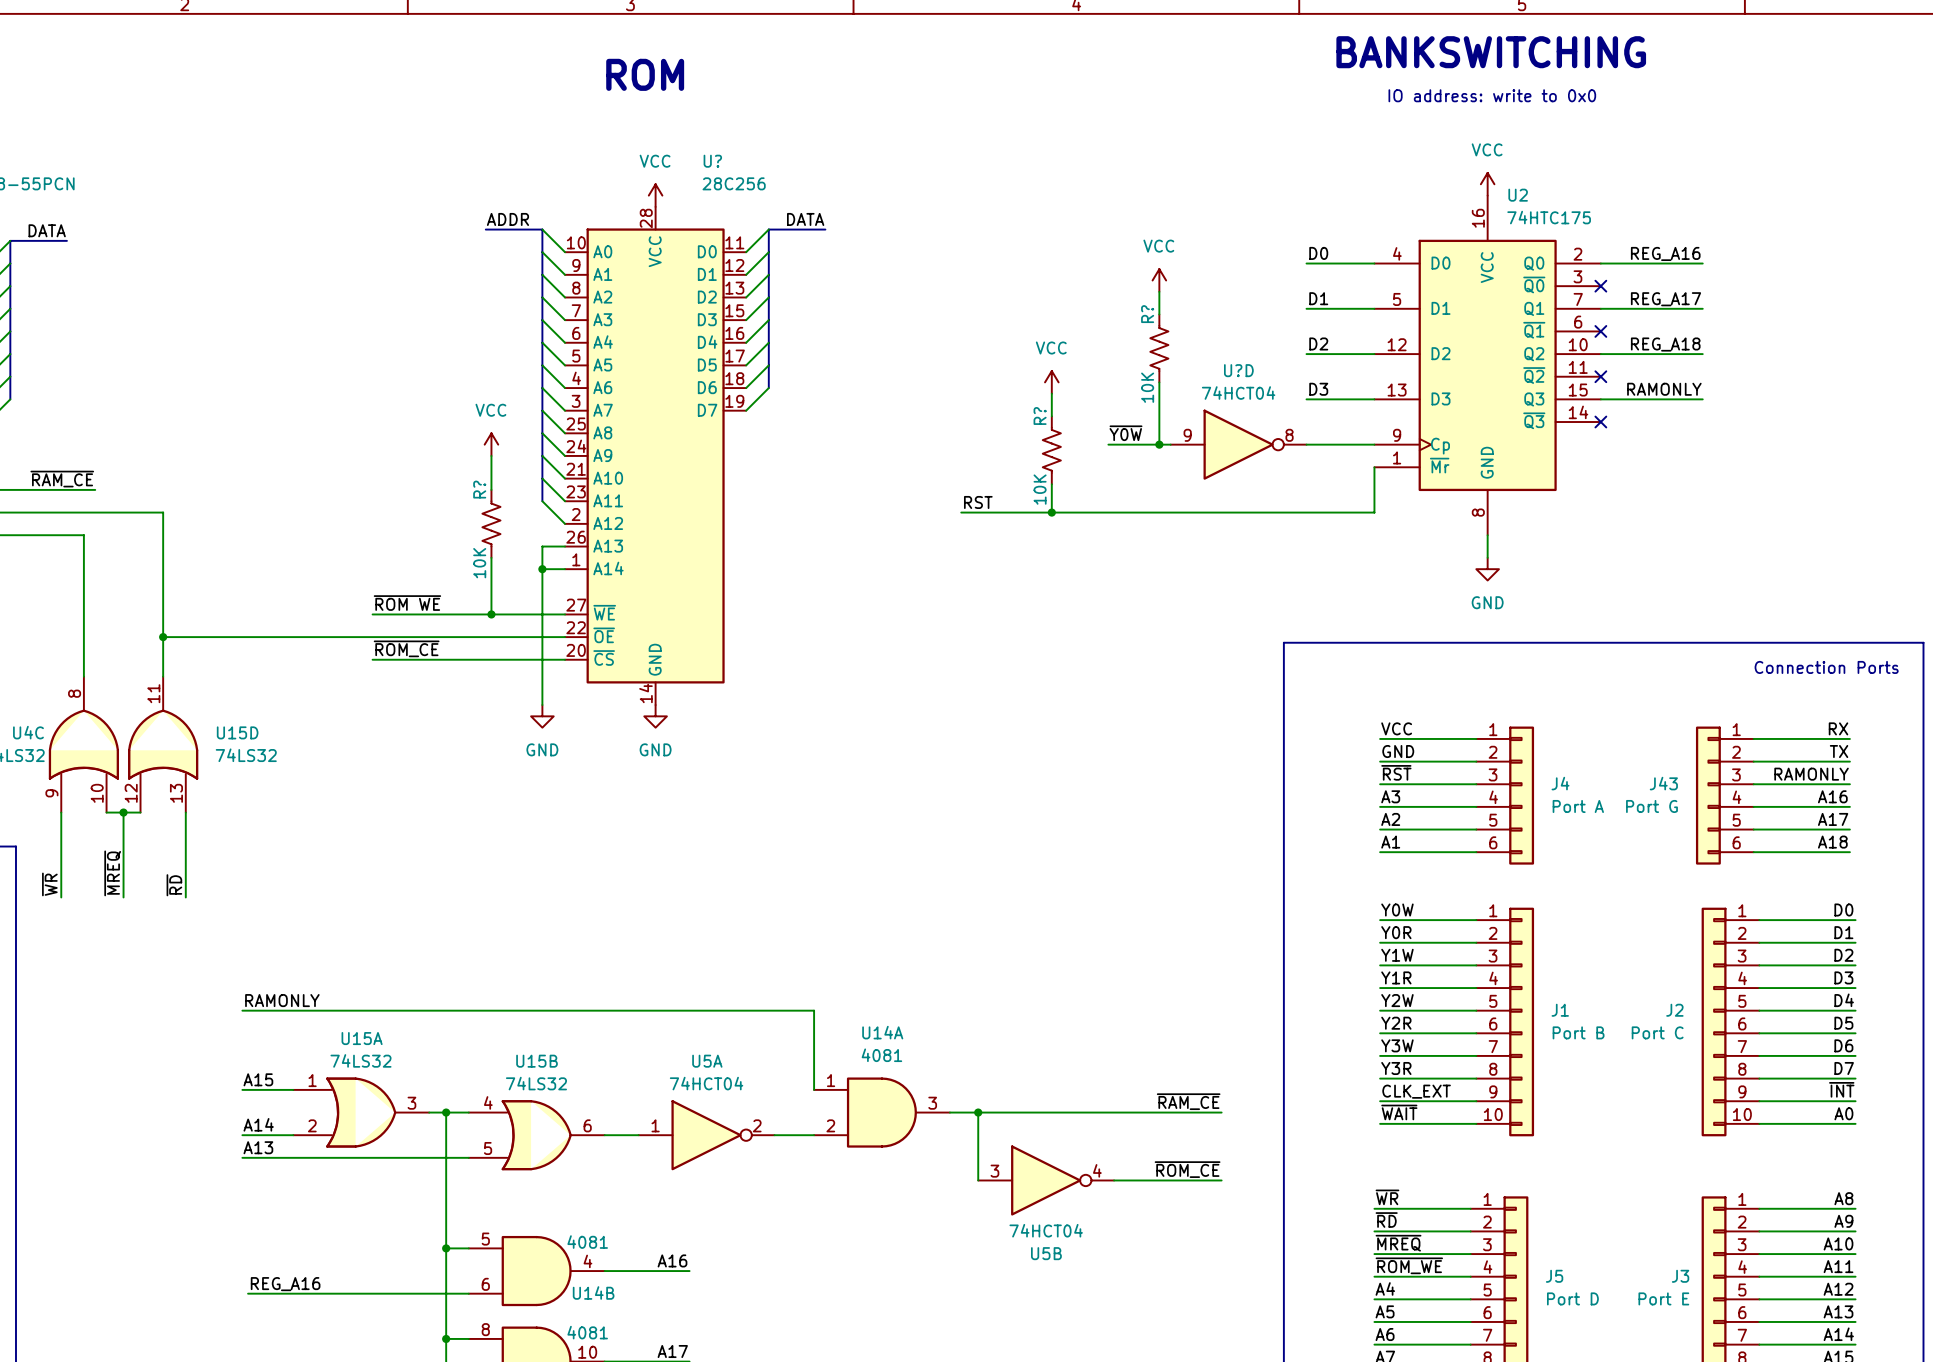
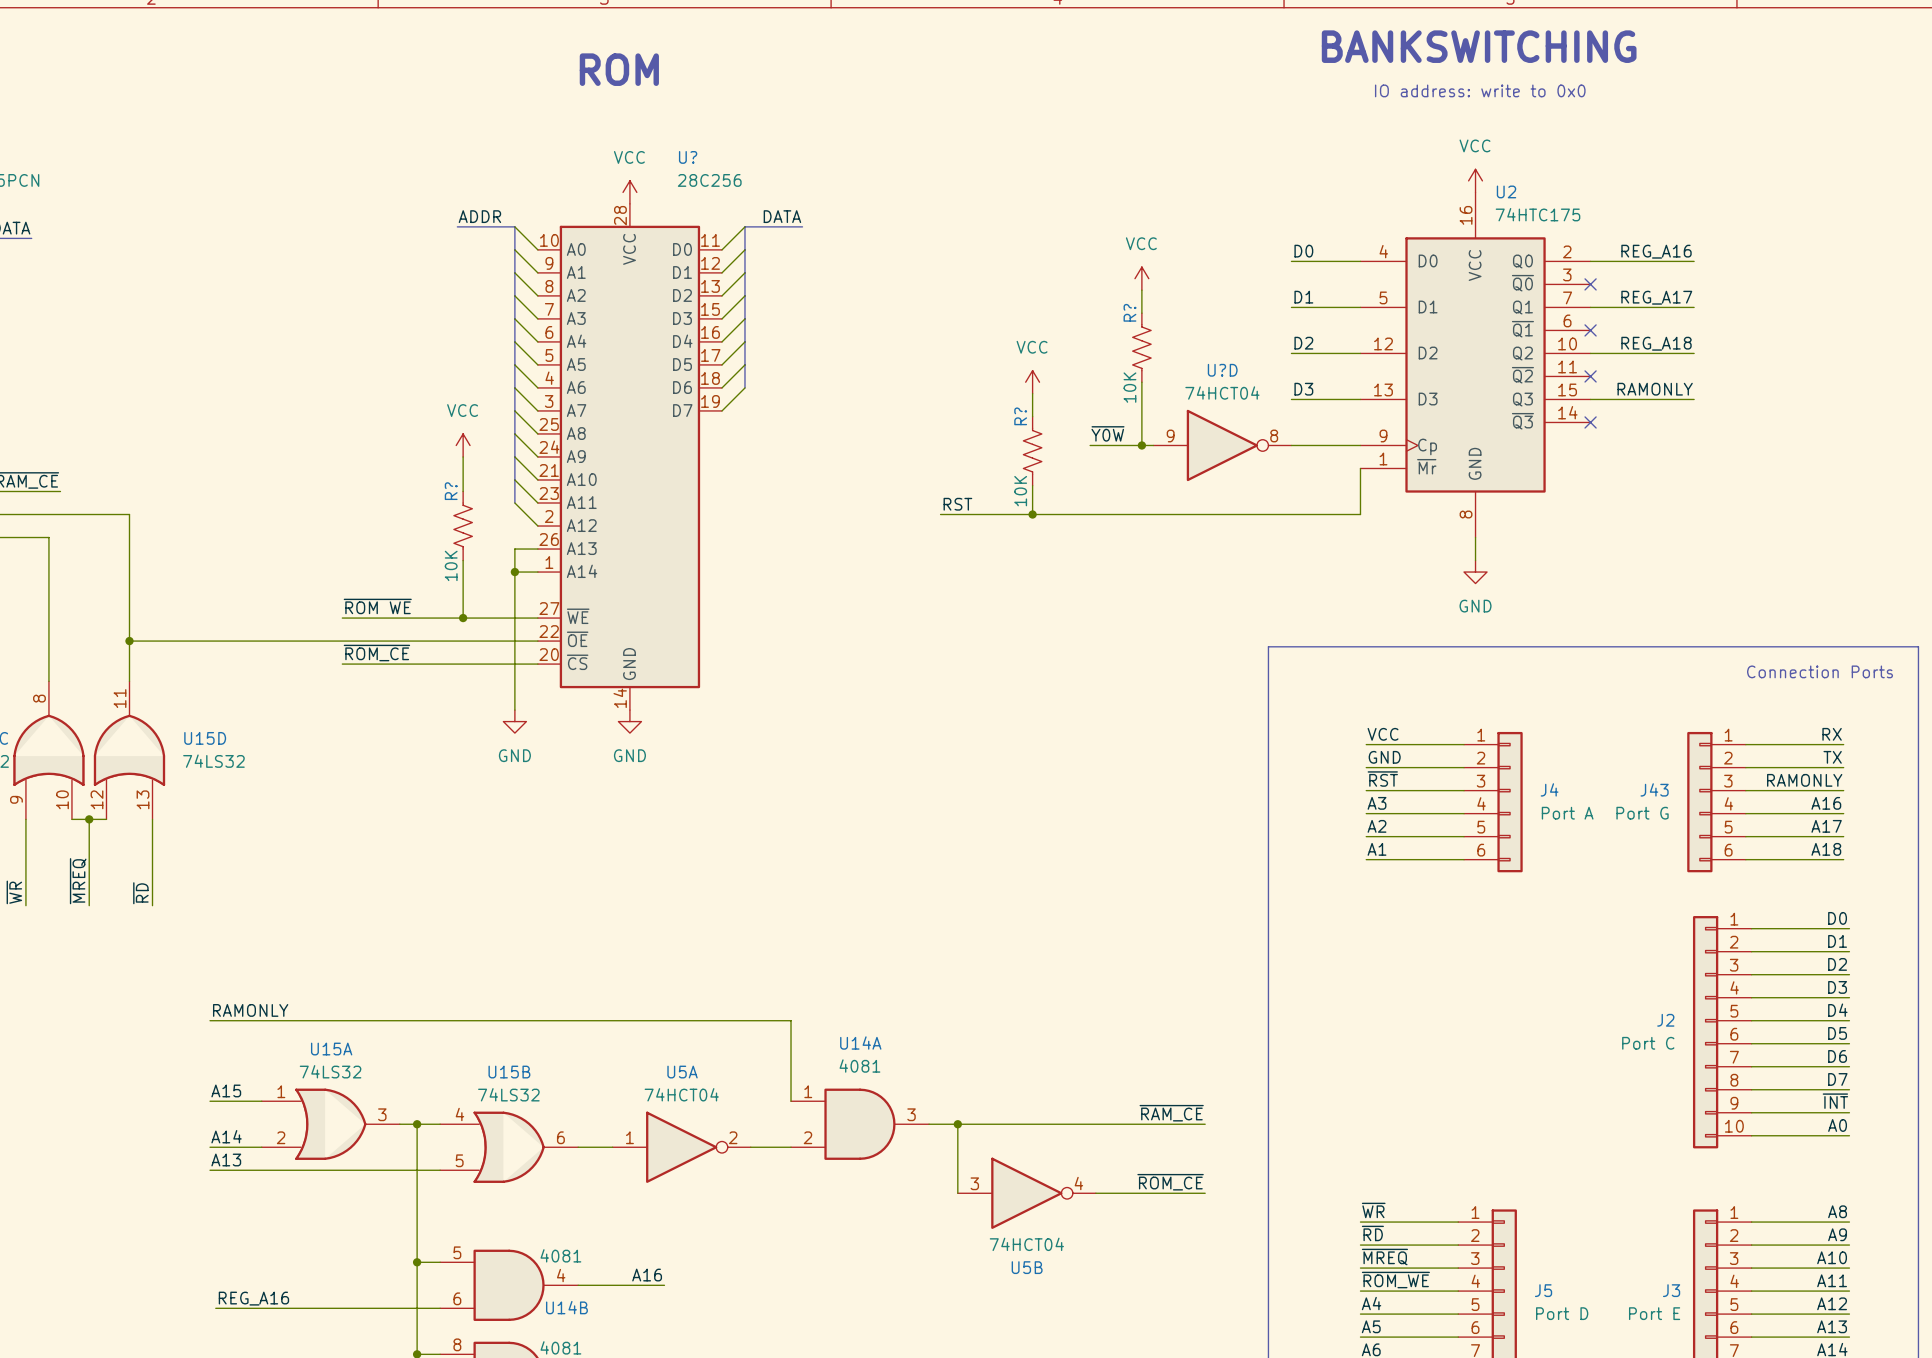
label: Y0W (1397, 910) -> none
wire: (1380, 920) (1476, 920) -> none
label: Y0R (1396, 932) -> none
wire: (1380, 942) (1476, 942) -> none
label: Y1W (1397, 955) -> none
wire: (1380, 965) (1476, 965) -> none
label: Y1R (1396, 977) -> none
wire: (1380, 988) (1476, 988) -> none
label: Y2W (1397, 1000) -> none
wire: (1380, 1010) (1476, 1010) -> none
J1: Port B (1505, 1021) -> none
label: Y2R (1396, 1023) -> none
wire: (1380, 1033) (1476, 1033) -> none
label: Y3W (1397, 1045) -> none
wire: (1380, 1055) (1476, 1055) -> none
label: Y3R (1396, 1068) -> none
wire: (1380, 1078) (1476, 1078) -> none
label: CLK_EXT (1416, 1091) -> none
wire: (1380, 1101) (1476, 1101) -> none
label: ~{WAIT} (1399, 1112) -> none
wire: (1380, 1123) (1476, 1123) -> none

